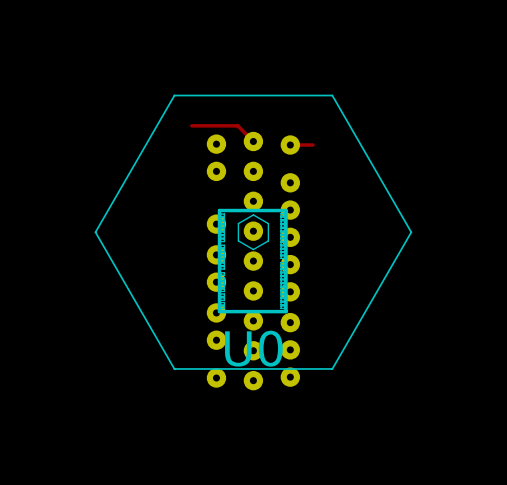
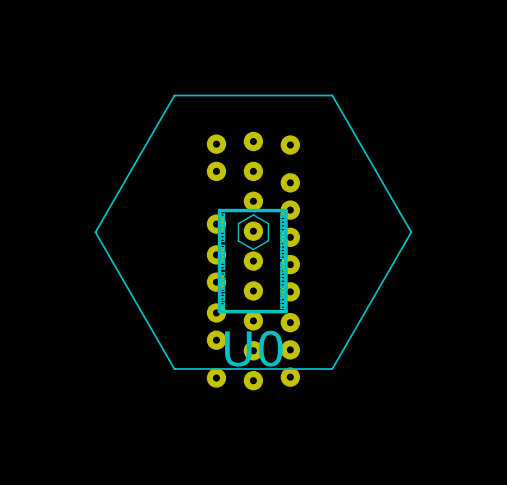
track: (191, 125) (237, 125) (253, 141) -> none
track: (290, 145) (313, 145) -> none

